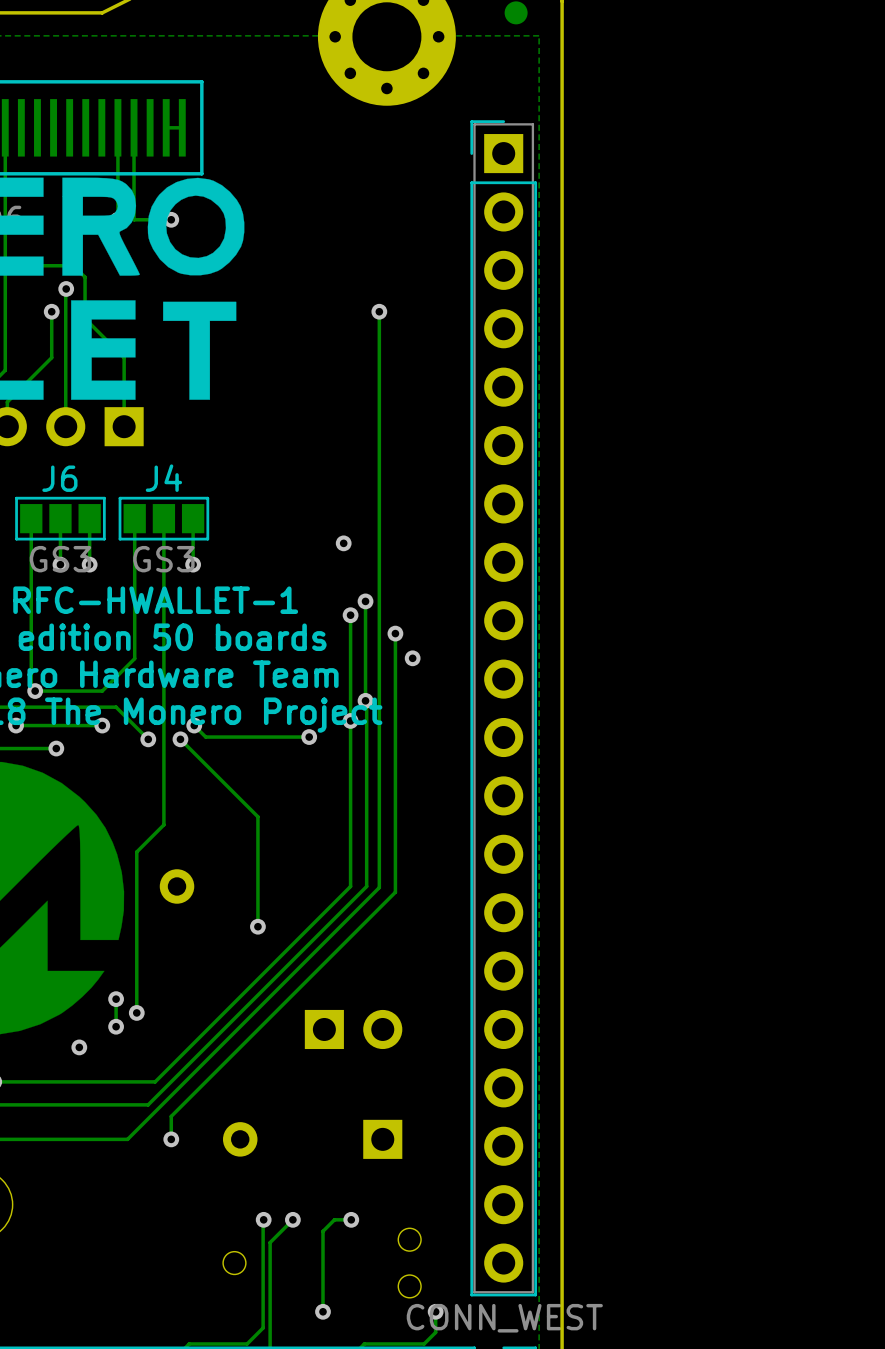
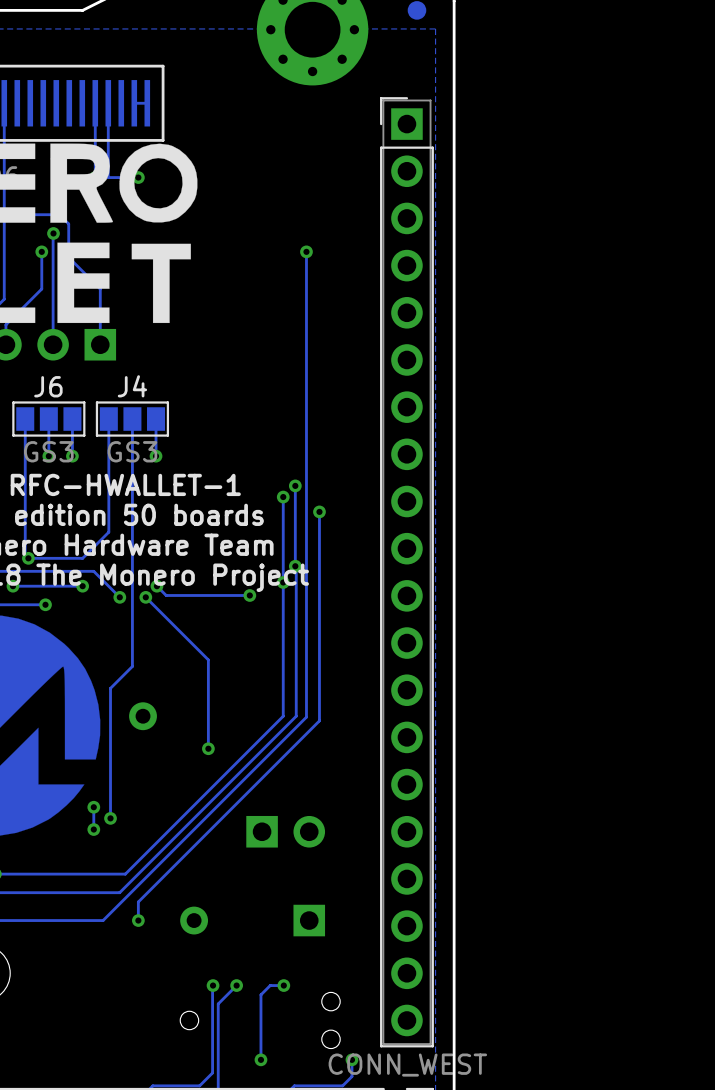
via: (343, 543) -> none
via: (412, 658) -> none
via: (79, 1047) -> none

